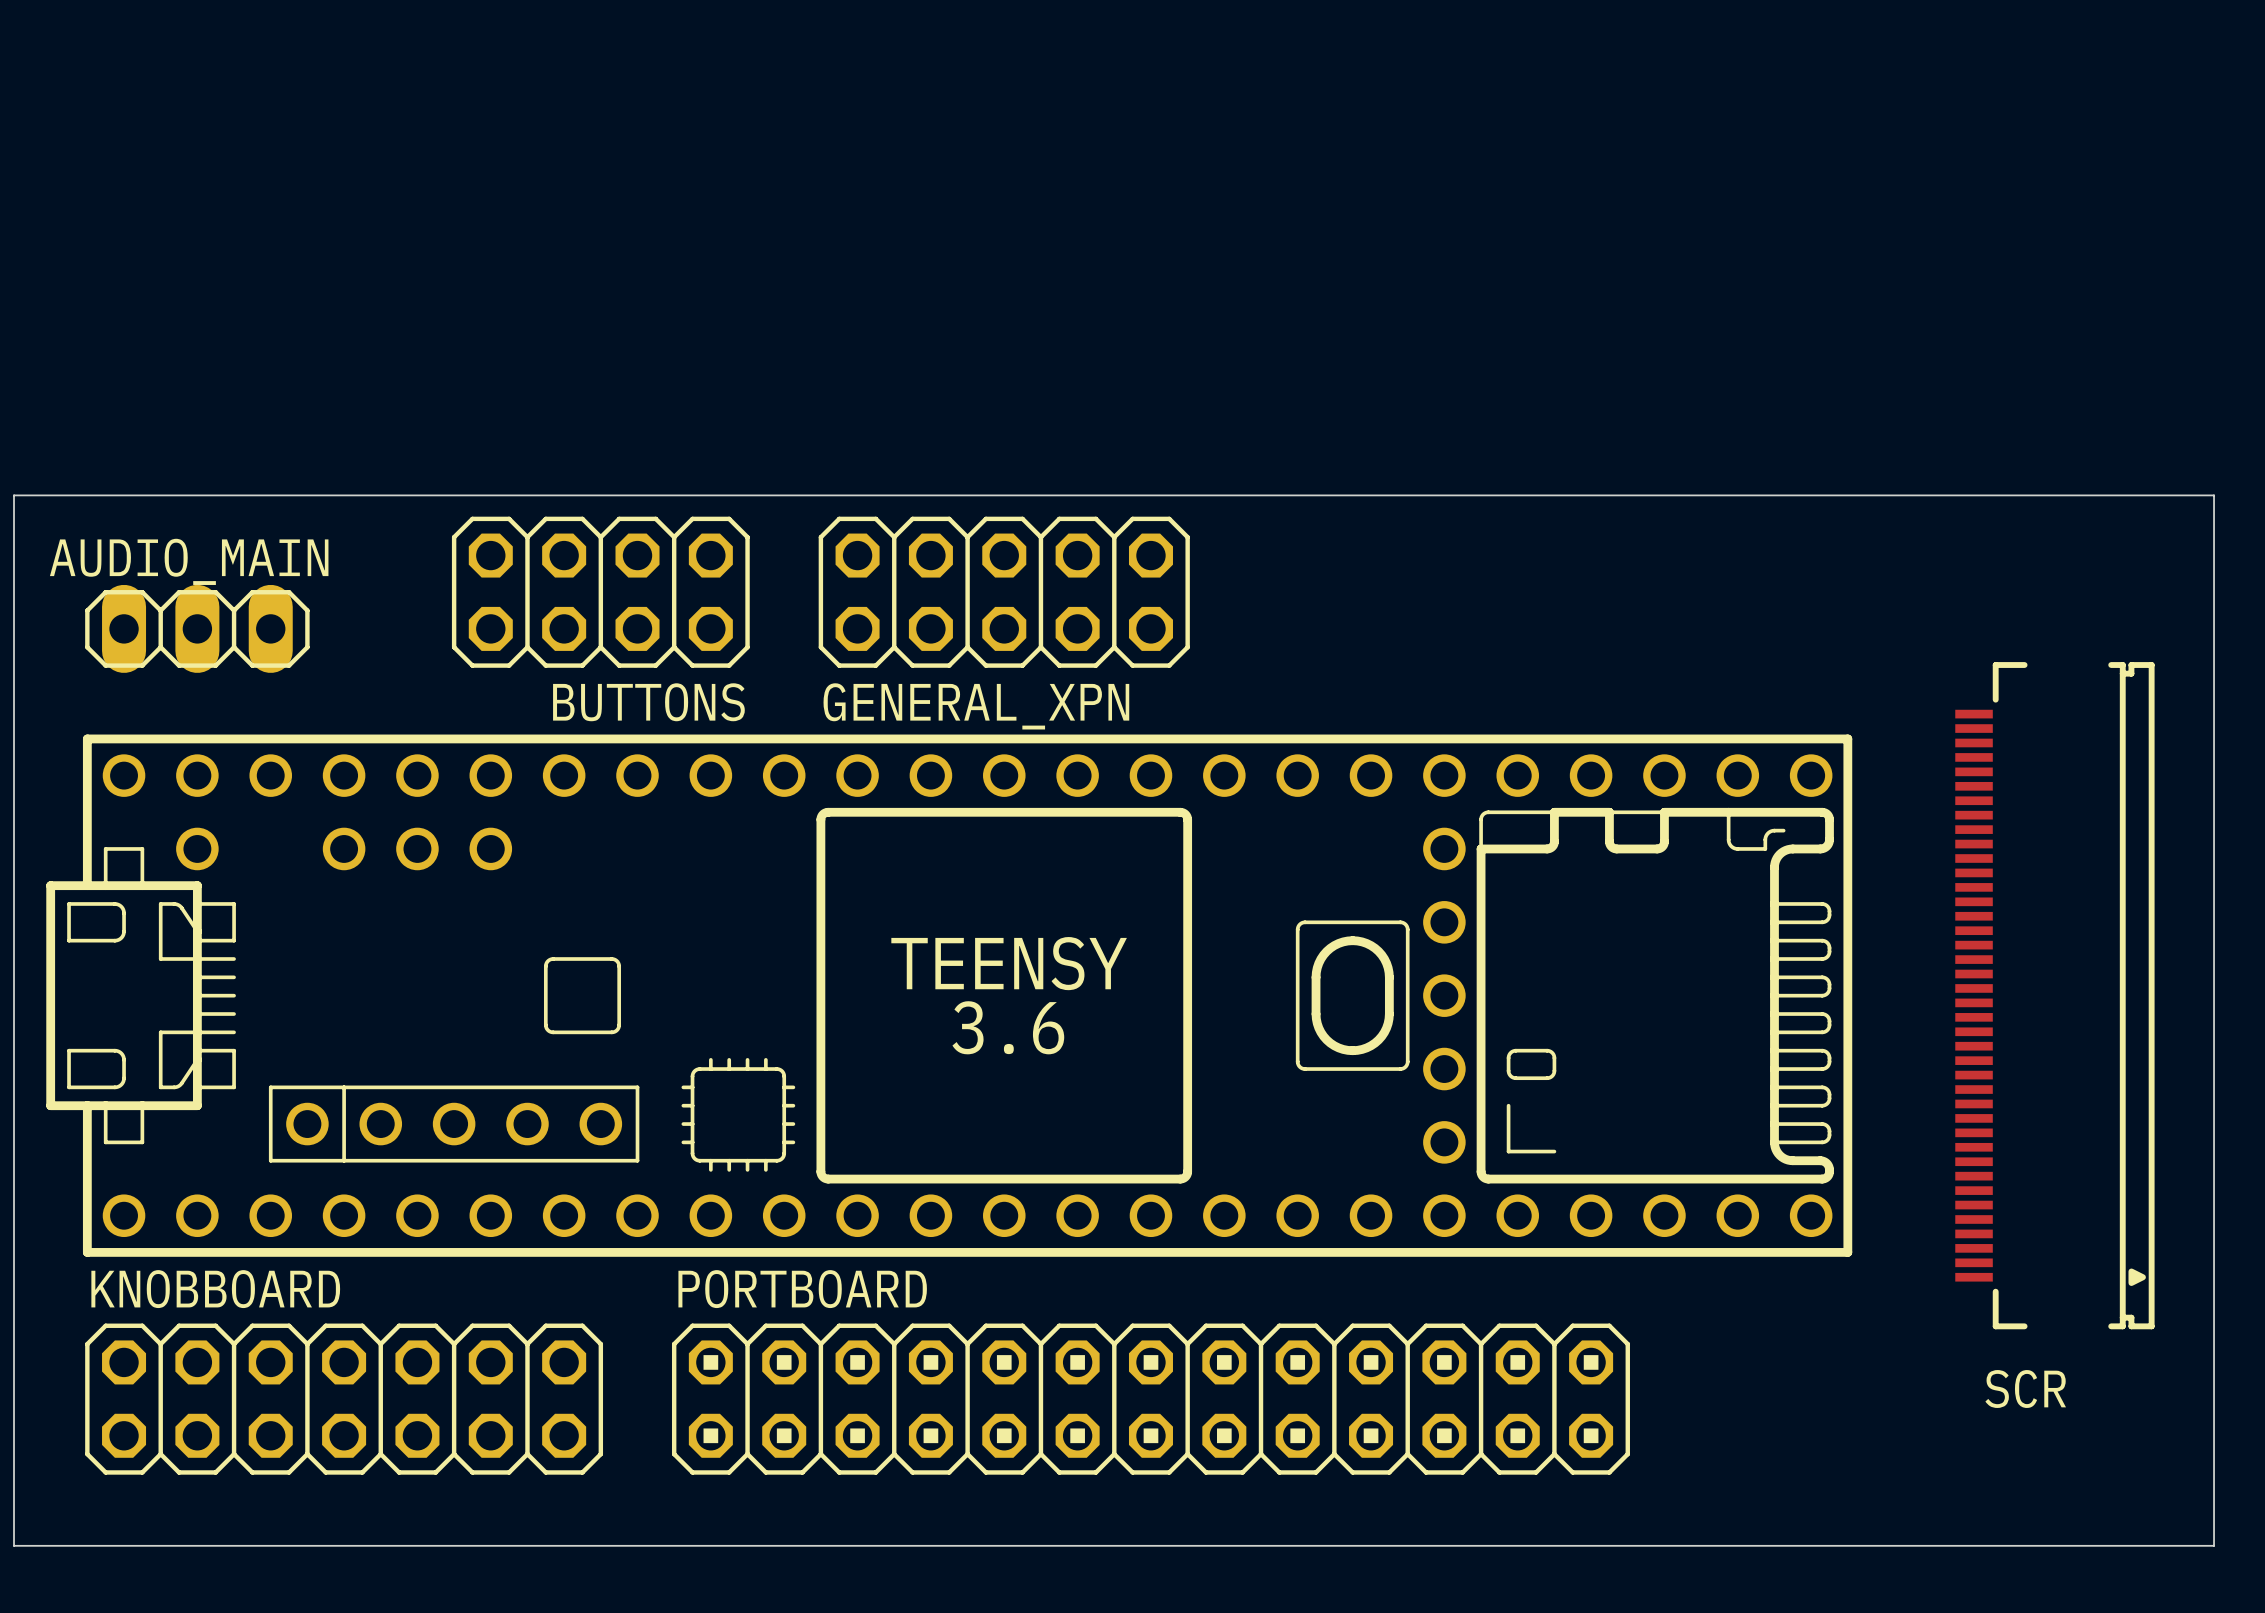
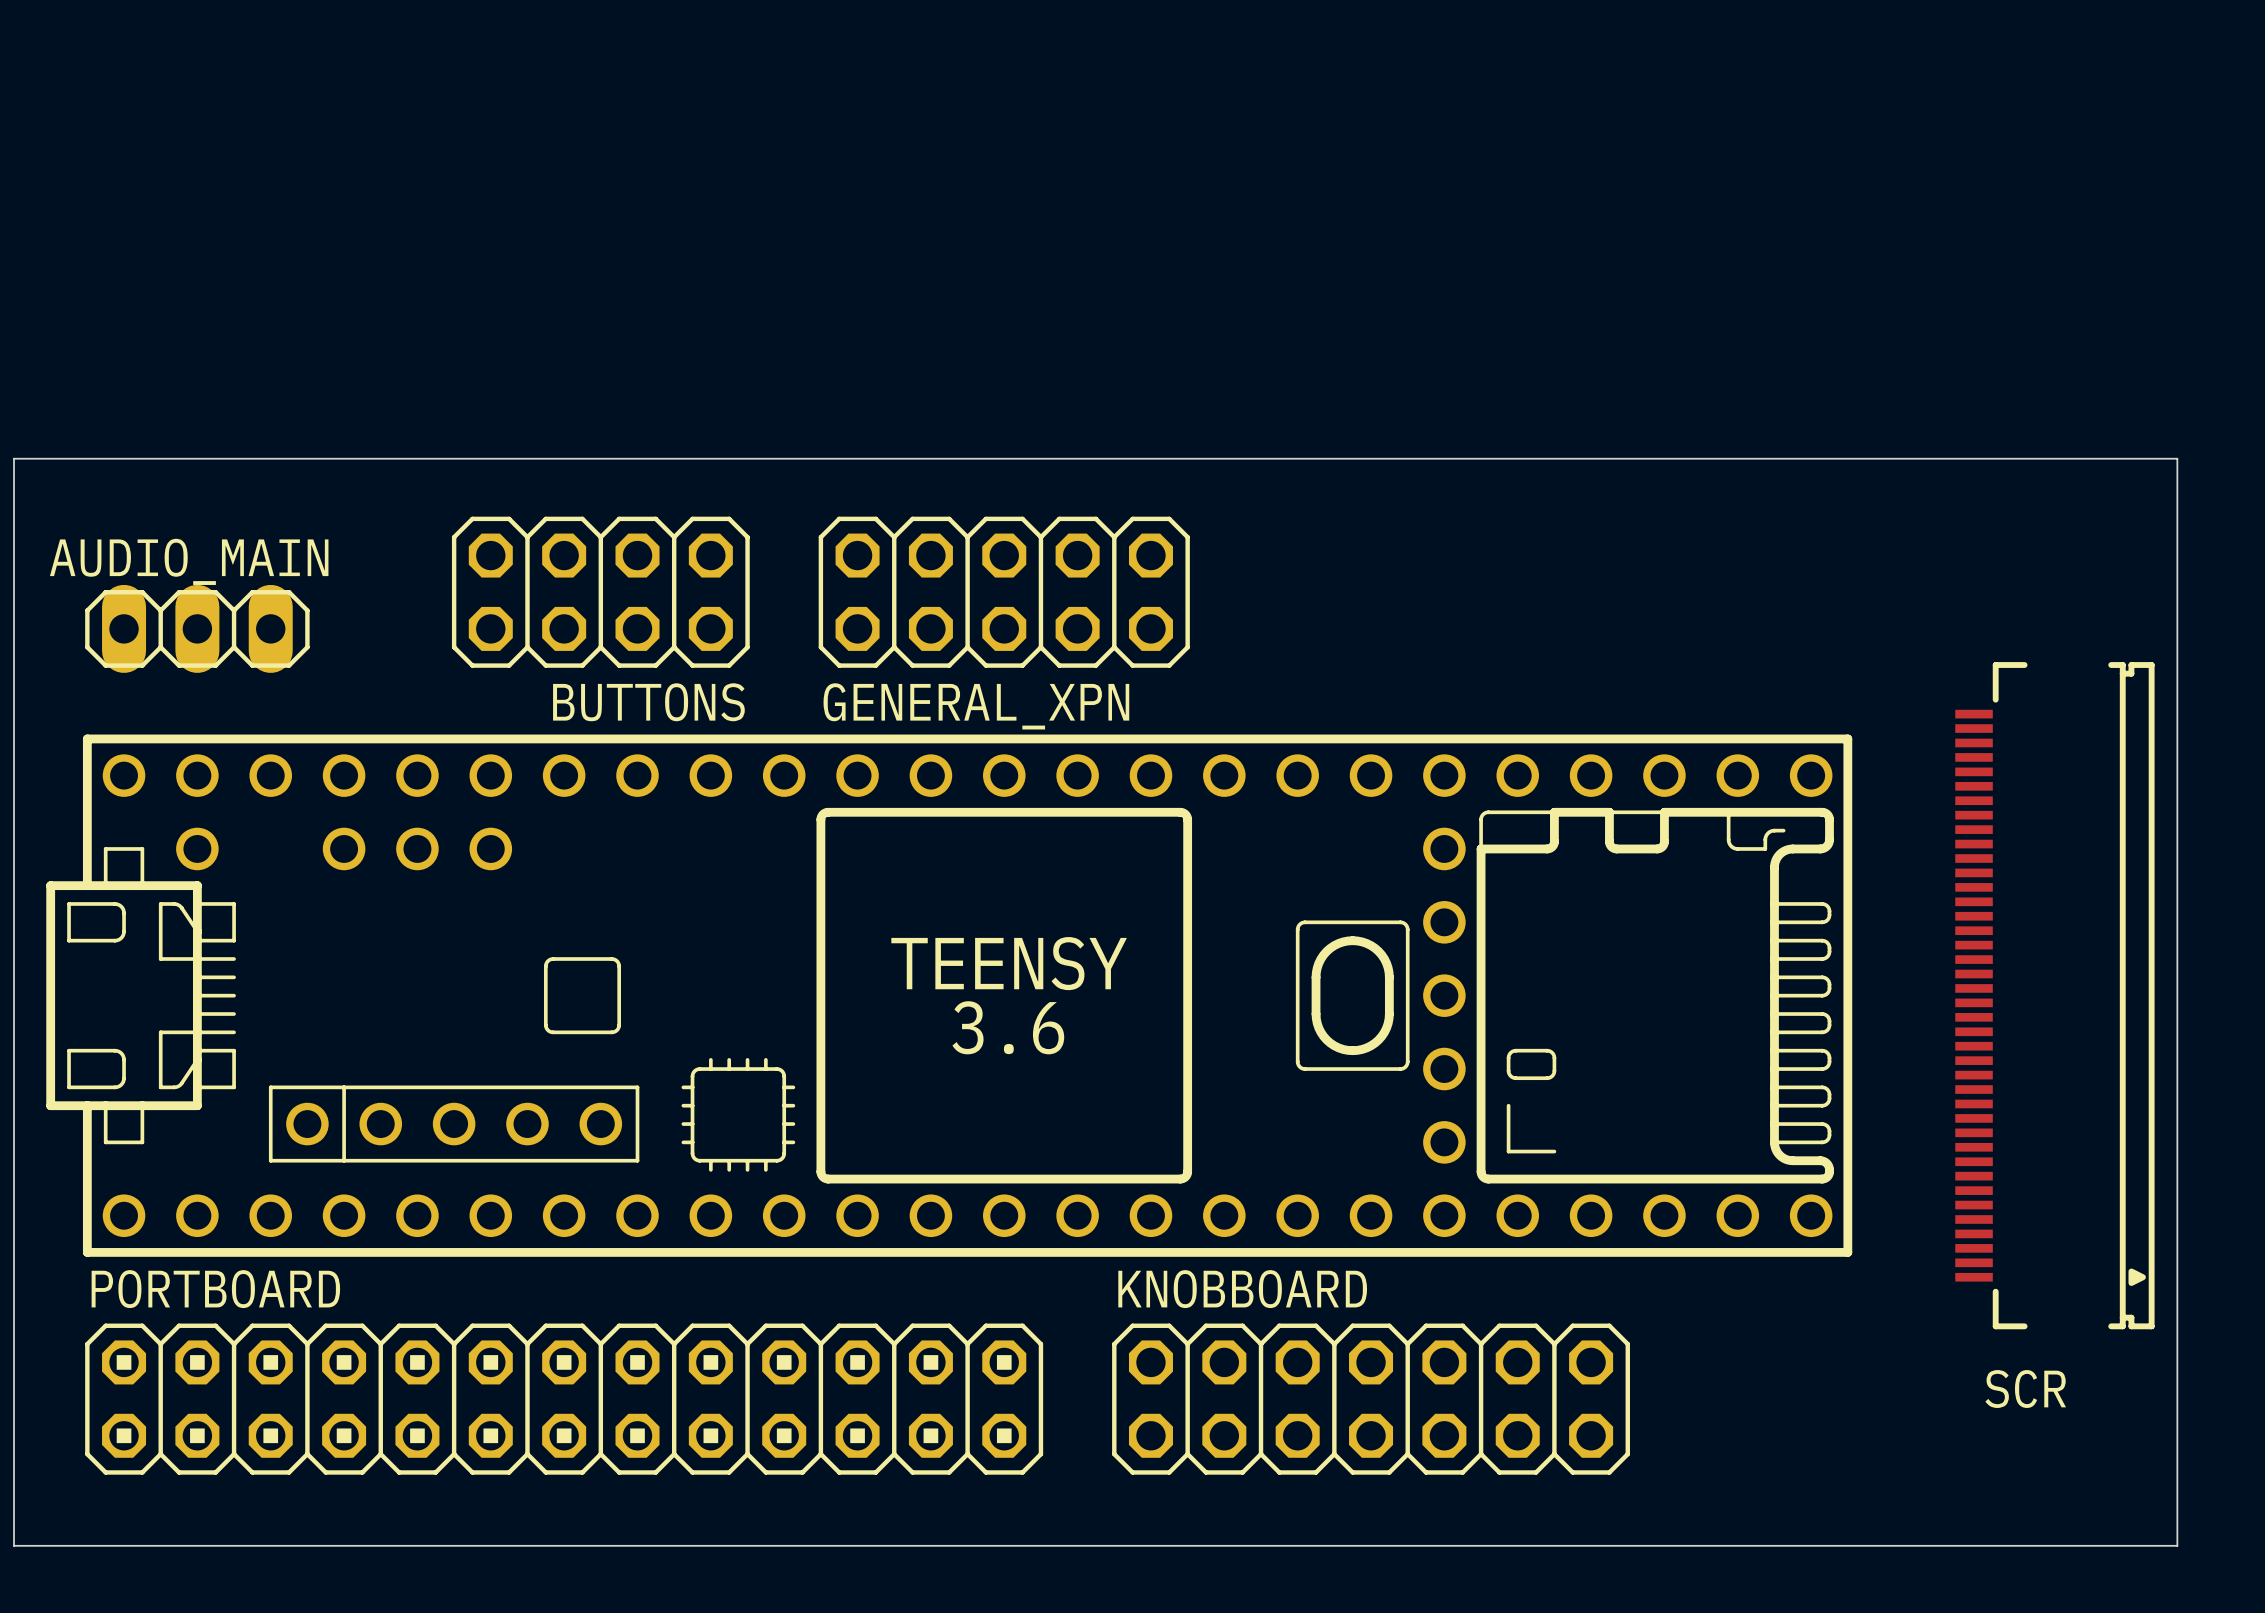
board edge: (14, 495) (2214, 495) (2214, 1545) (2177, 1545) -> (14, 495) (14, 458) (2177, 458) (2177, 1545)
KNOBBOARD: (344, 1399) -> none
PORTBOARD position: (1150, 1399) -> (564, 1399)
KNOBBOARD: none -> (1371, 1399)

